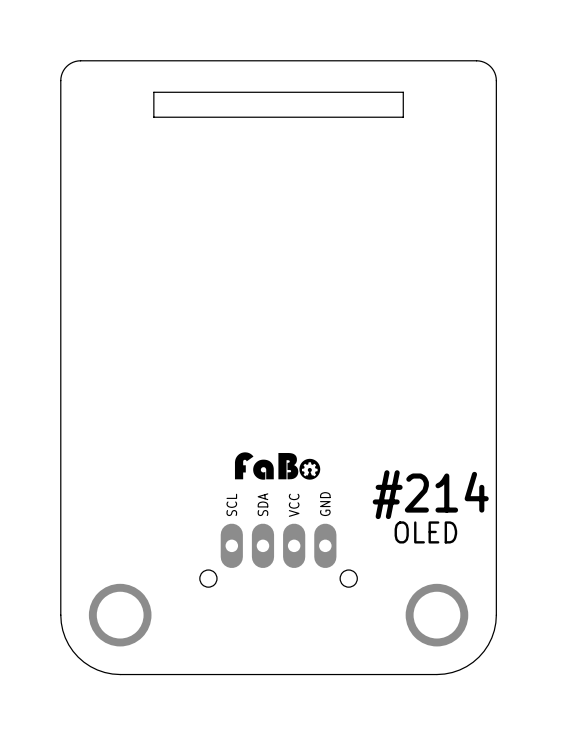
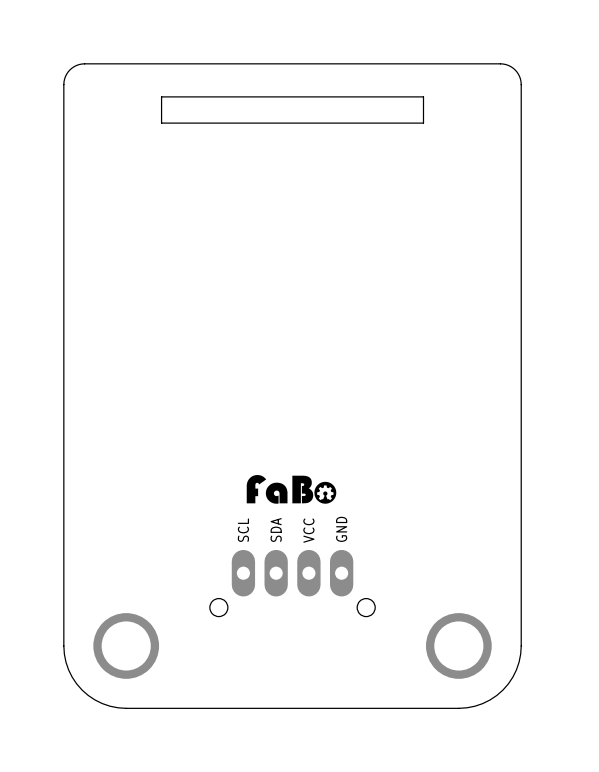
text: #214 (430, 494) -> none
text: OLED (425, 532) -> none

